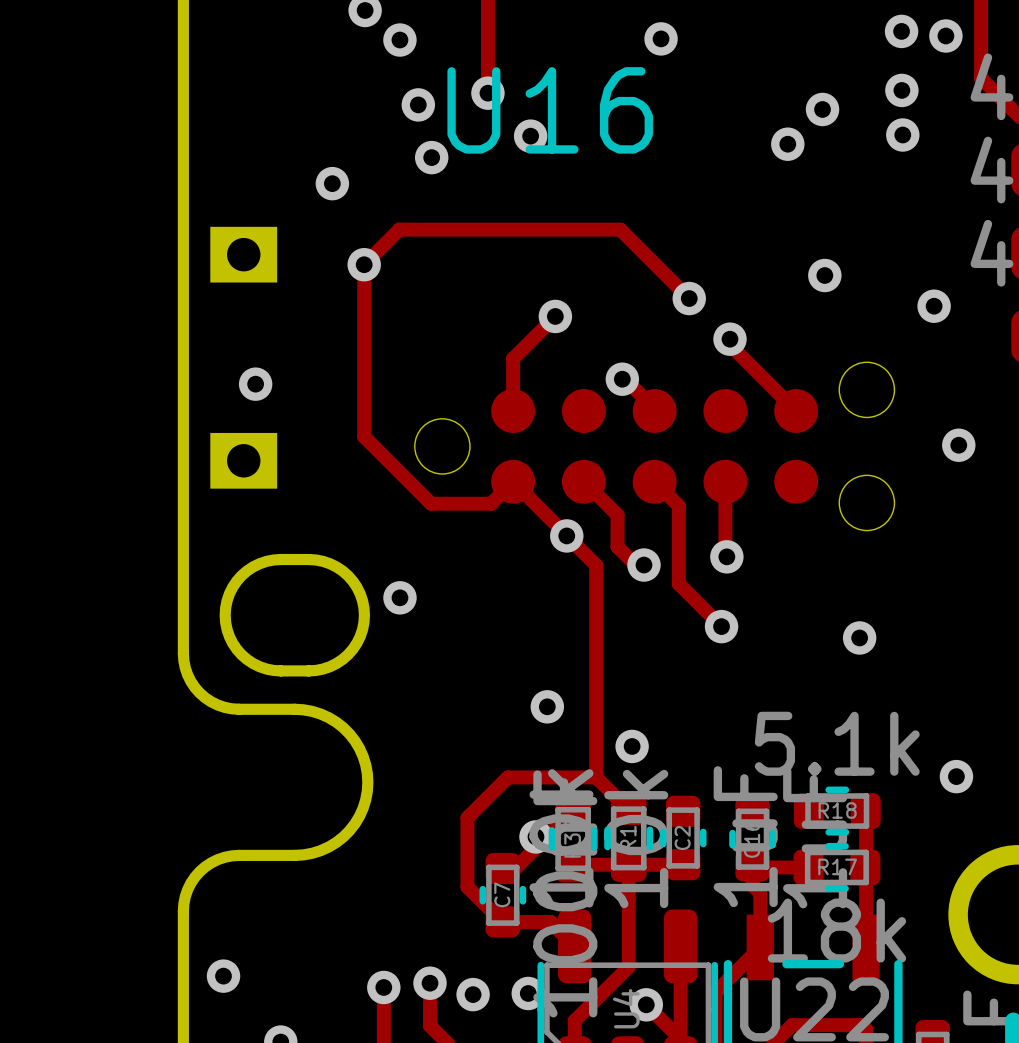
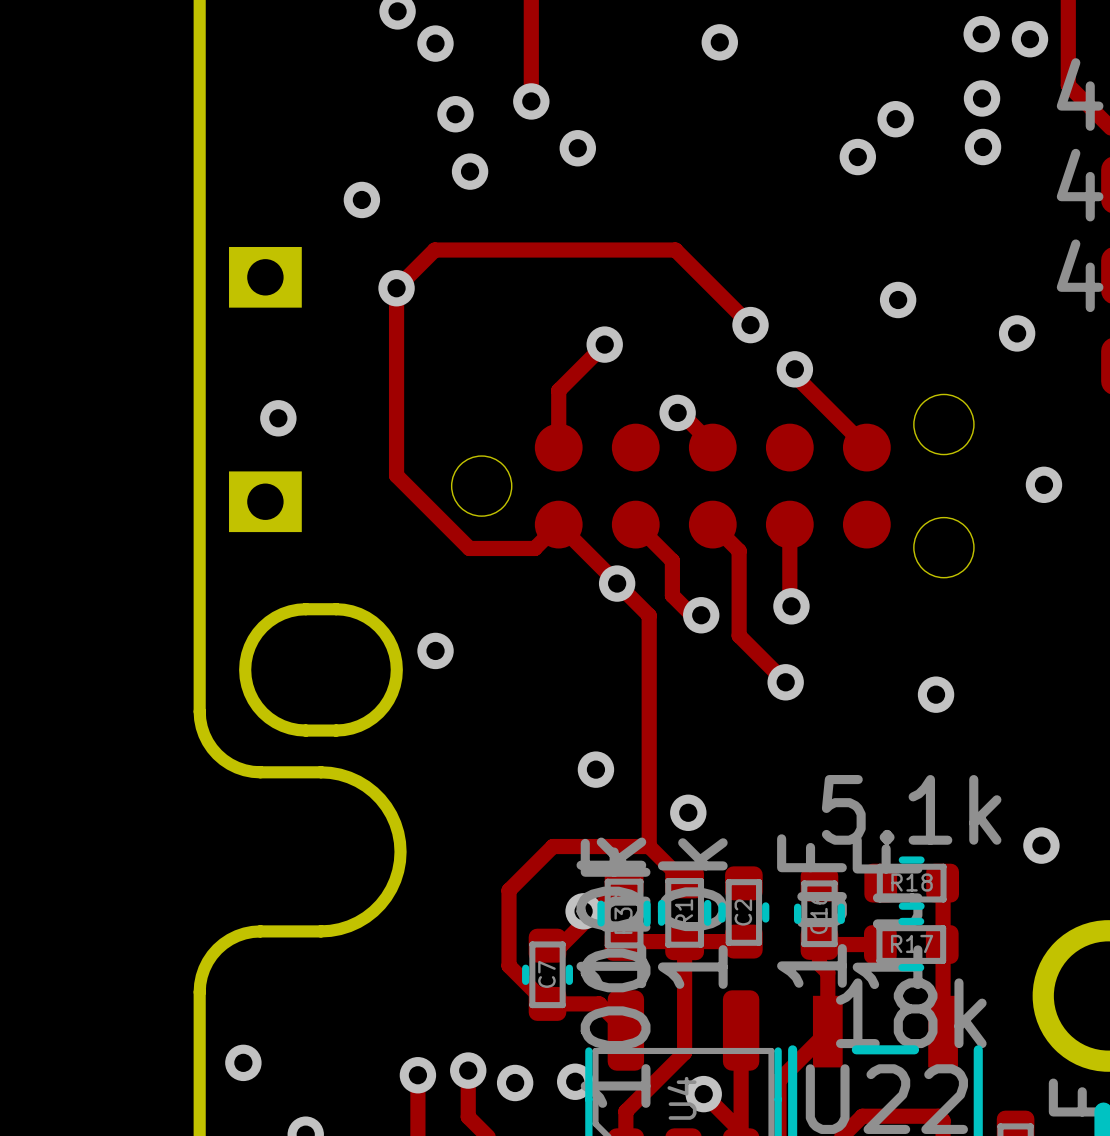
U16 name: U16 (550, 110) -> none

